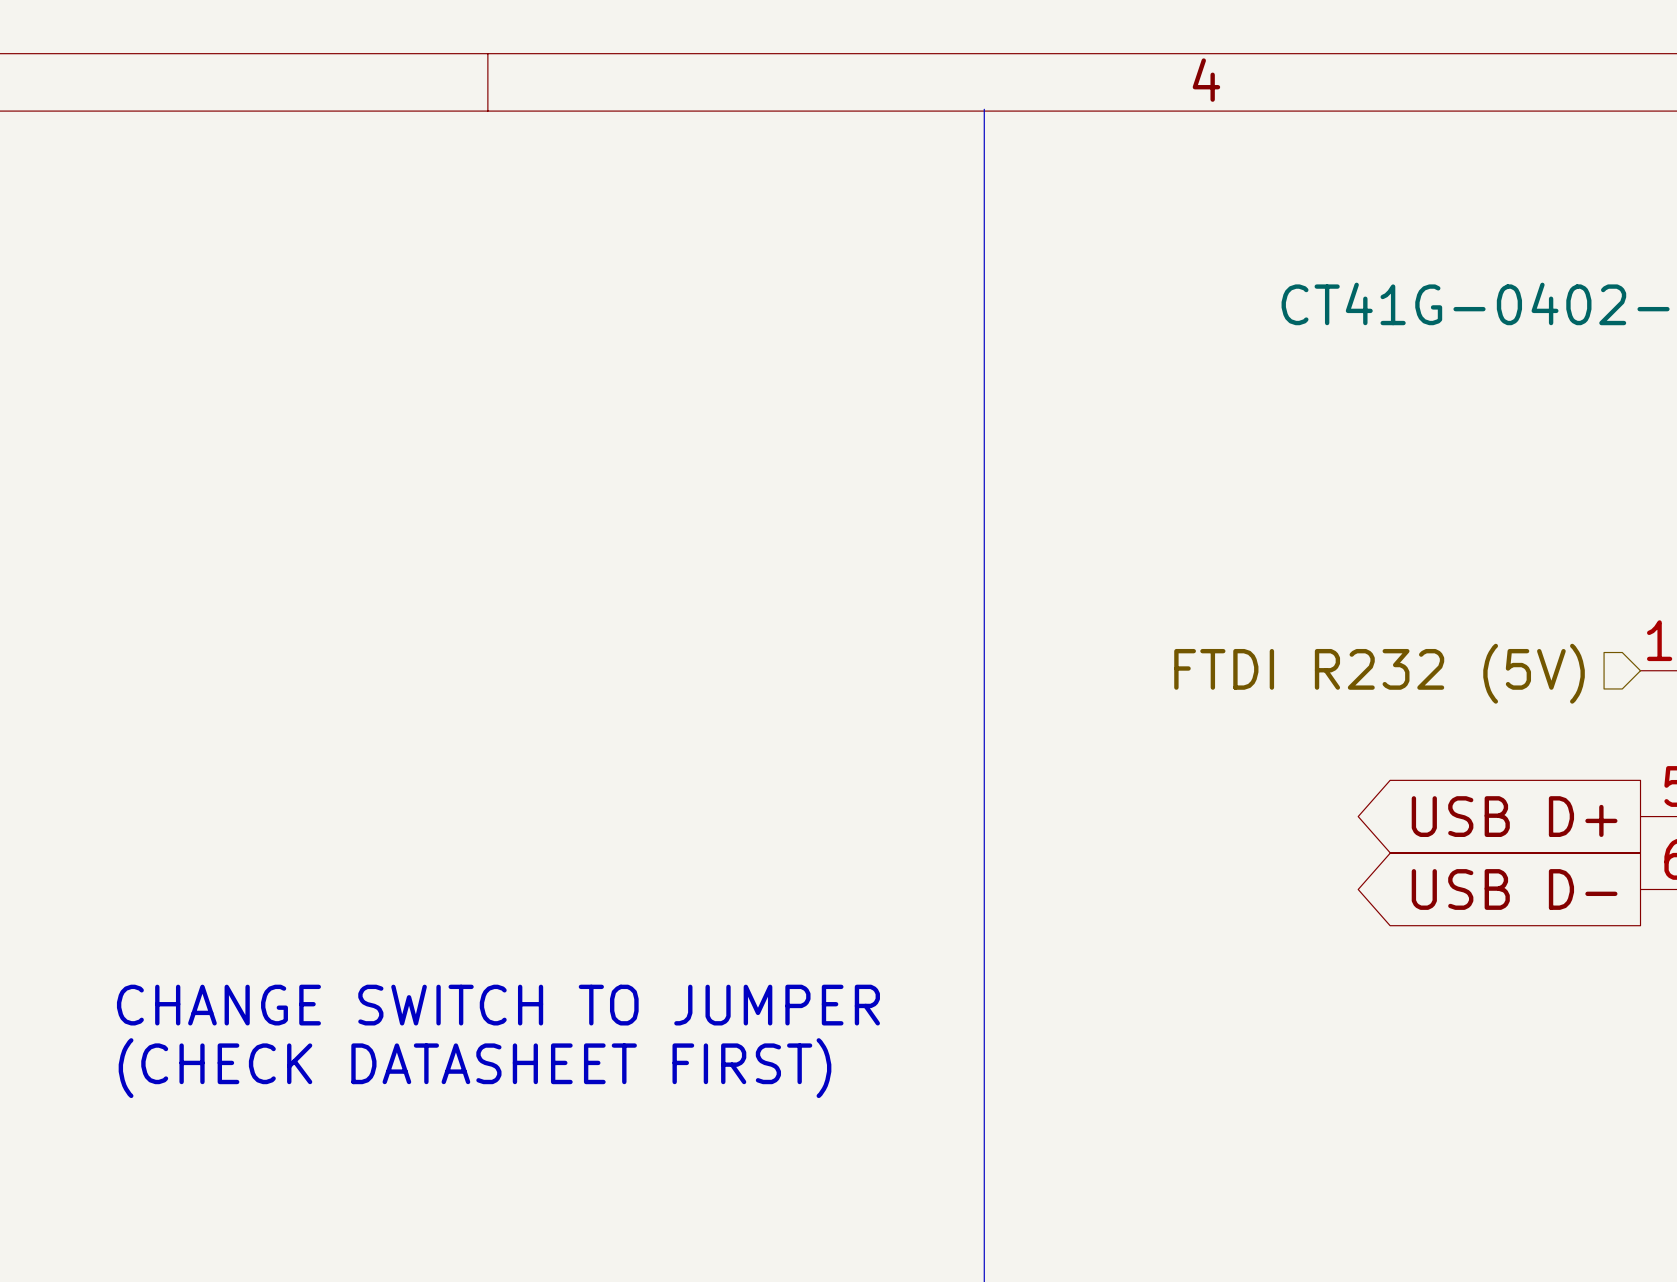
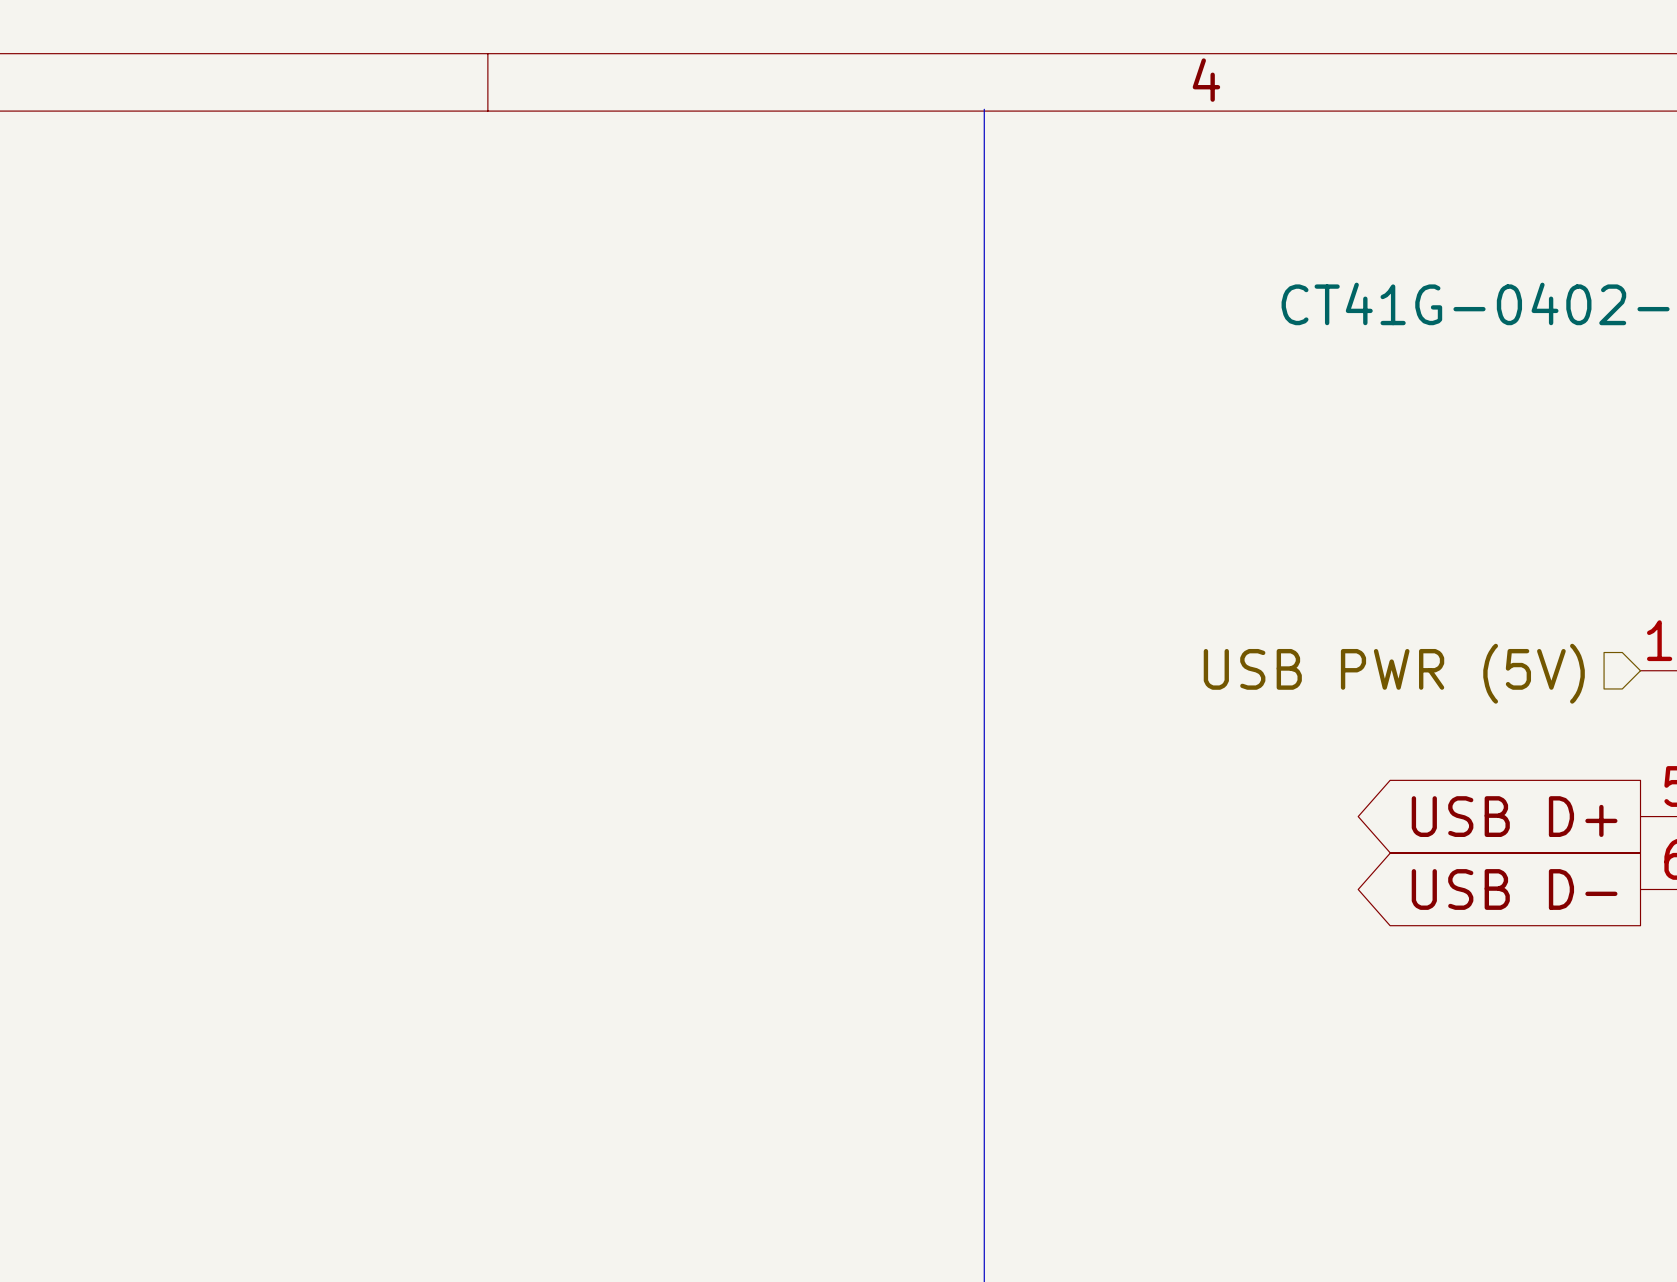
hierarchical label: FTDI R232 (5V) (1379, 673) -> USB PWR (5V) (1394, 673)
text: CHANGE SWITCH TO JUMPER (498, 1005) -> none
text: (CHECK DATASHEET FIRST) (475, 1068) -> none

